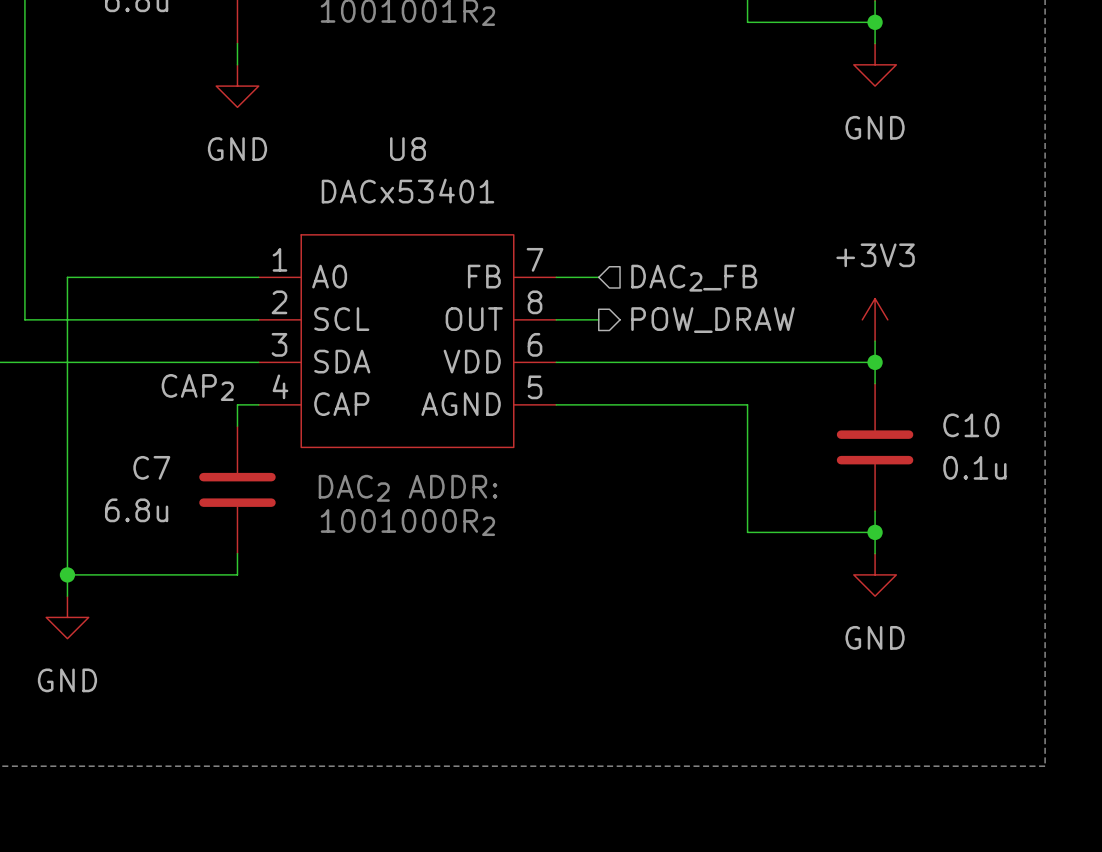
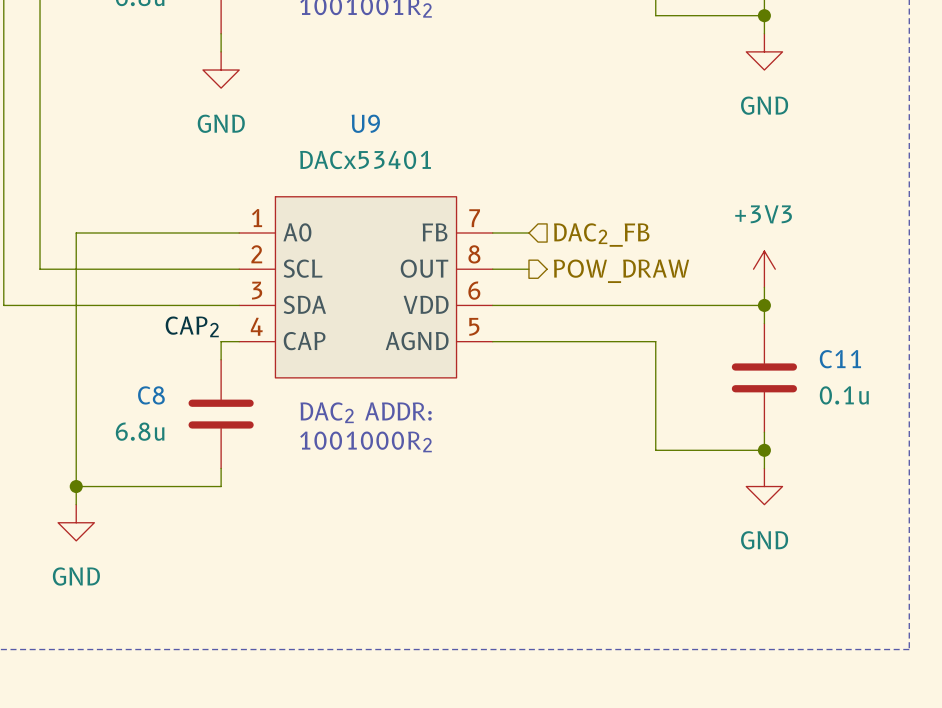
U8 name: U8 (408, 149) -> U9 (365, 123)
C10 name: C10 (971, 425) -> C11 (840, 359)
C7 name: C7 (151, 467) -> C8 (151, 395)

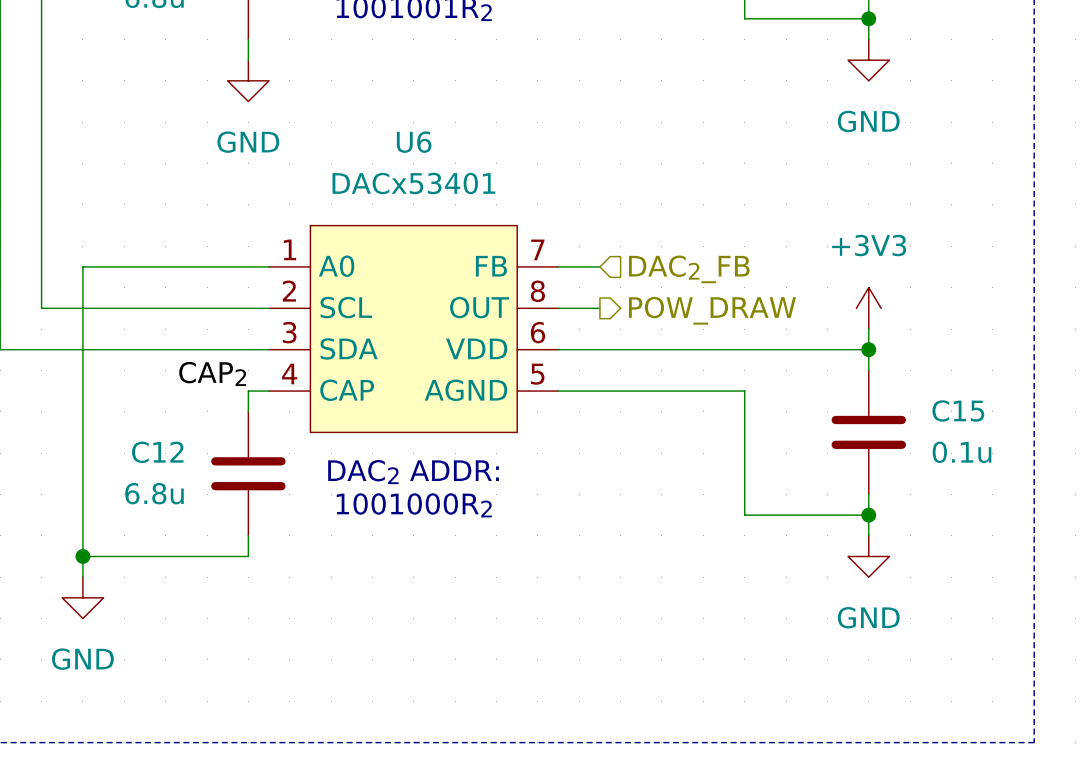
U9 name: U9 (365, 123) -> U6 (414, 142)
C11 name: C11 (840, 359) -> C15 (958, 410)
C8 name: C8 (151, 395) -> C12 (157, 452)

